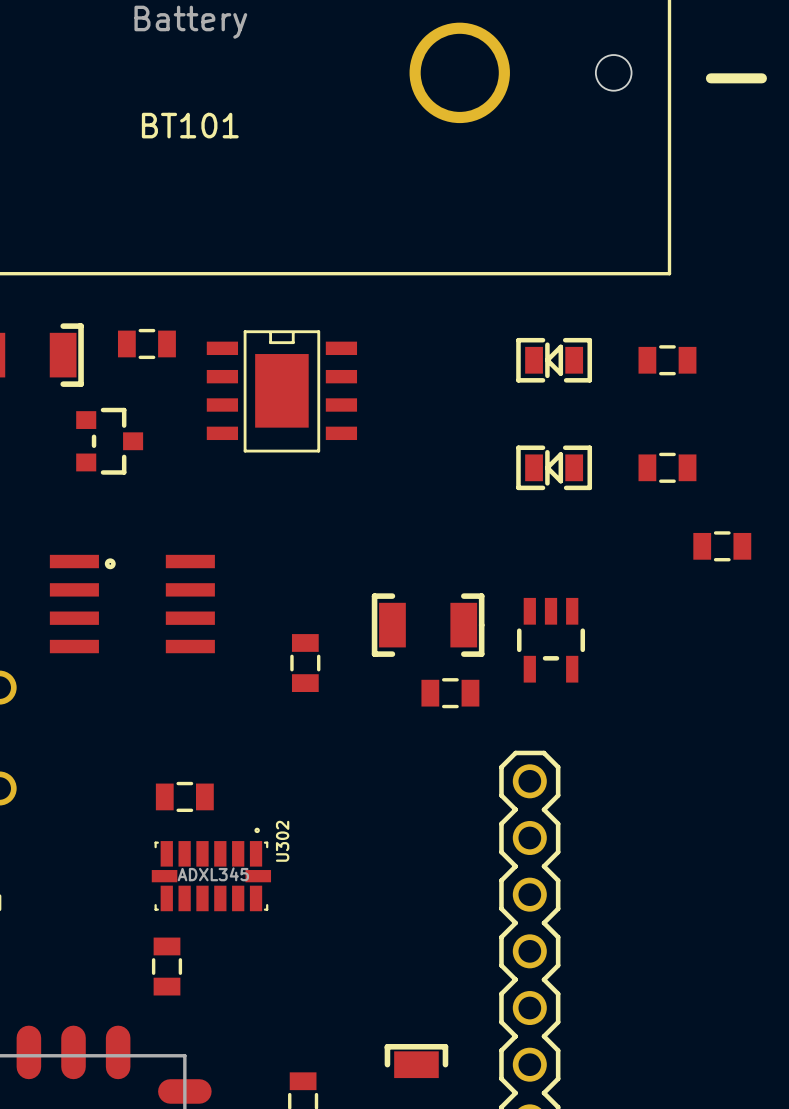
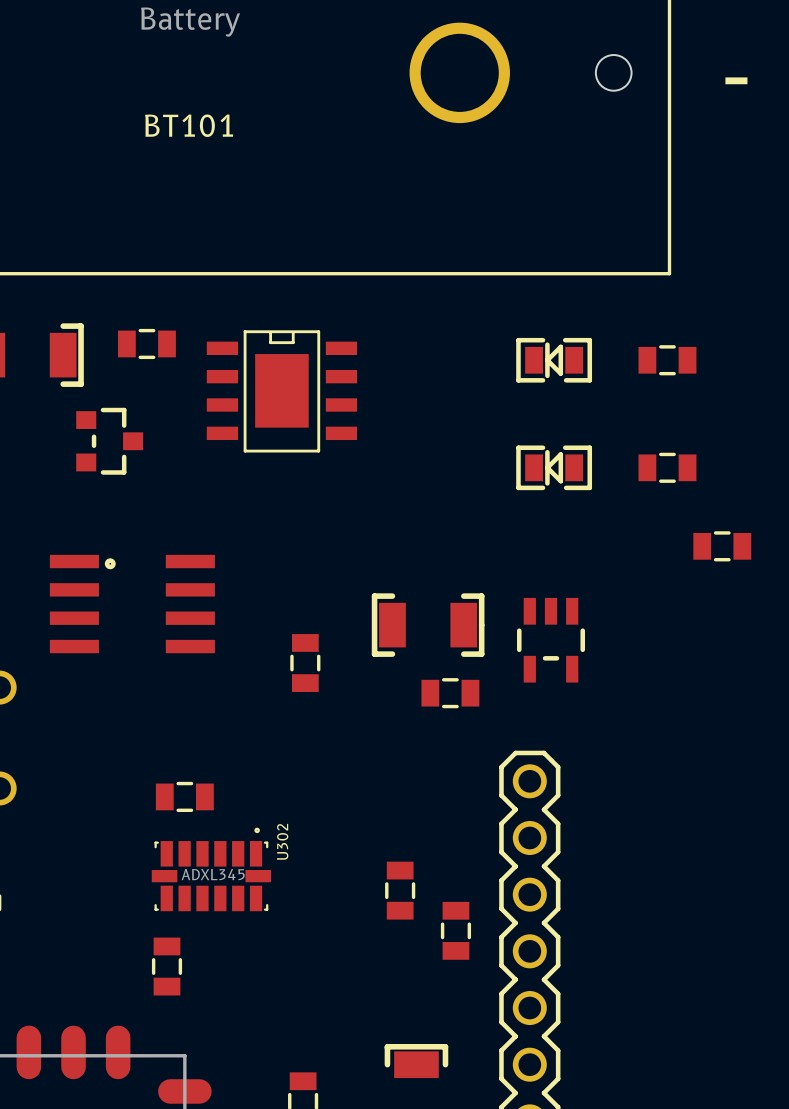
part: none -> (400, 890)
part: none -> (455, 930)

